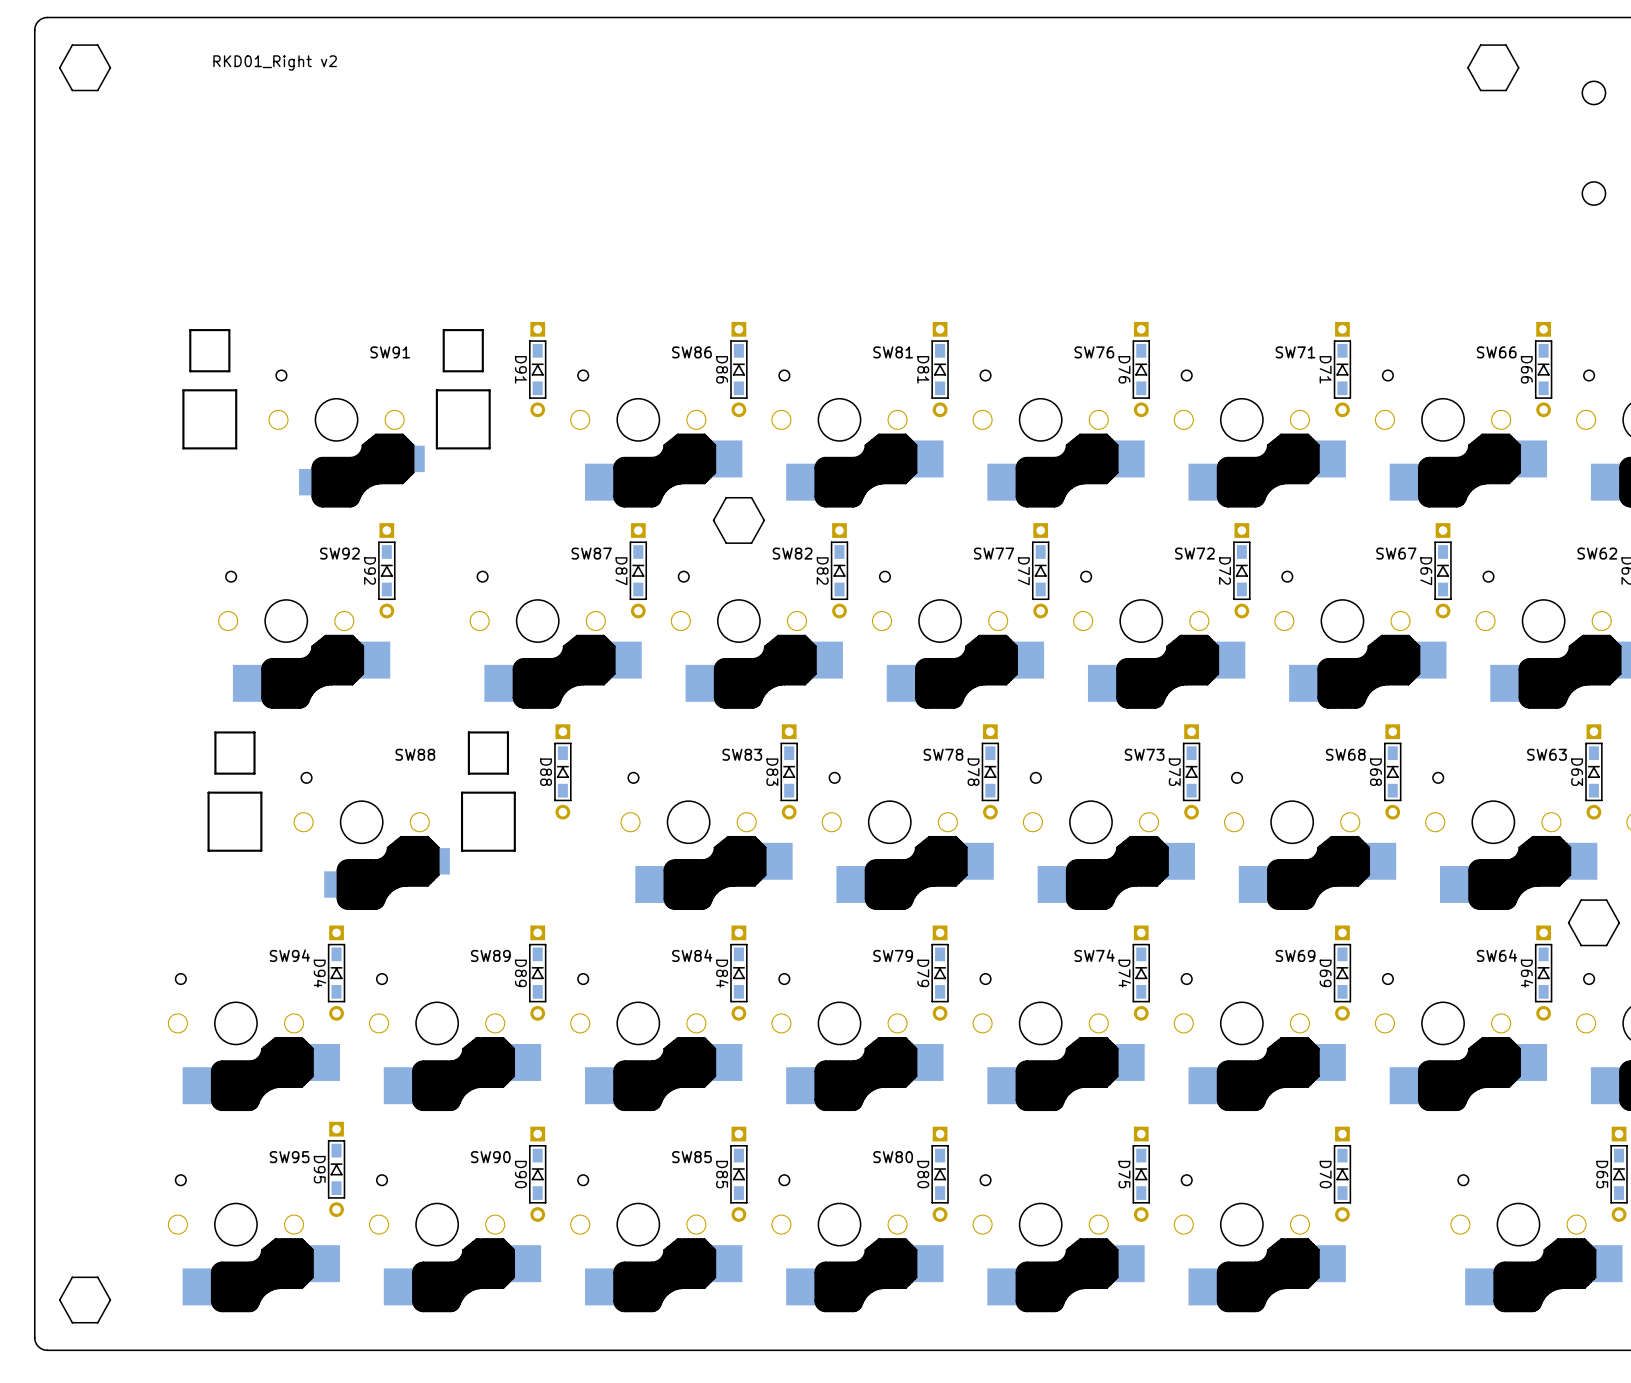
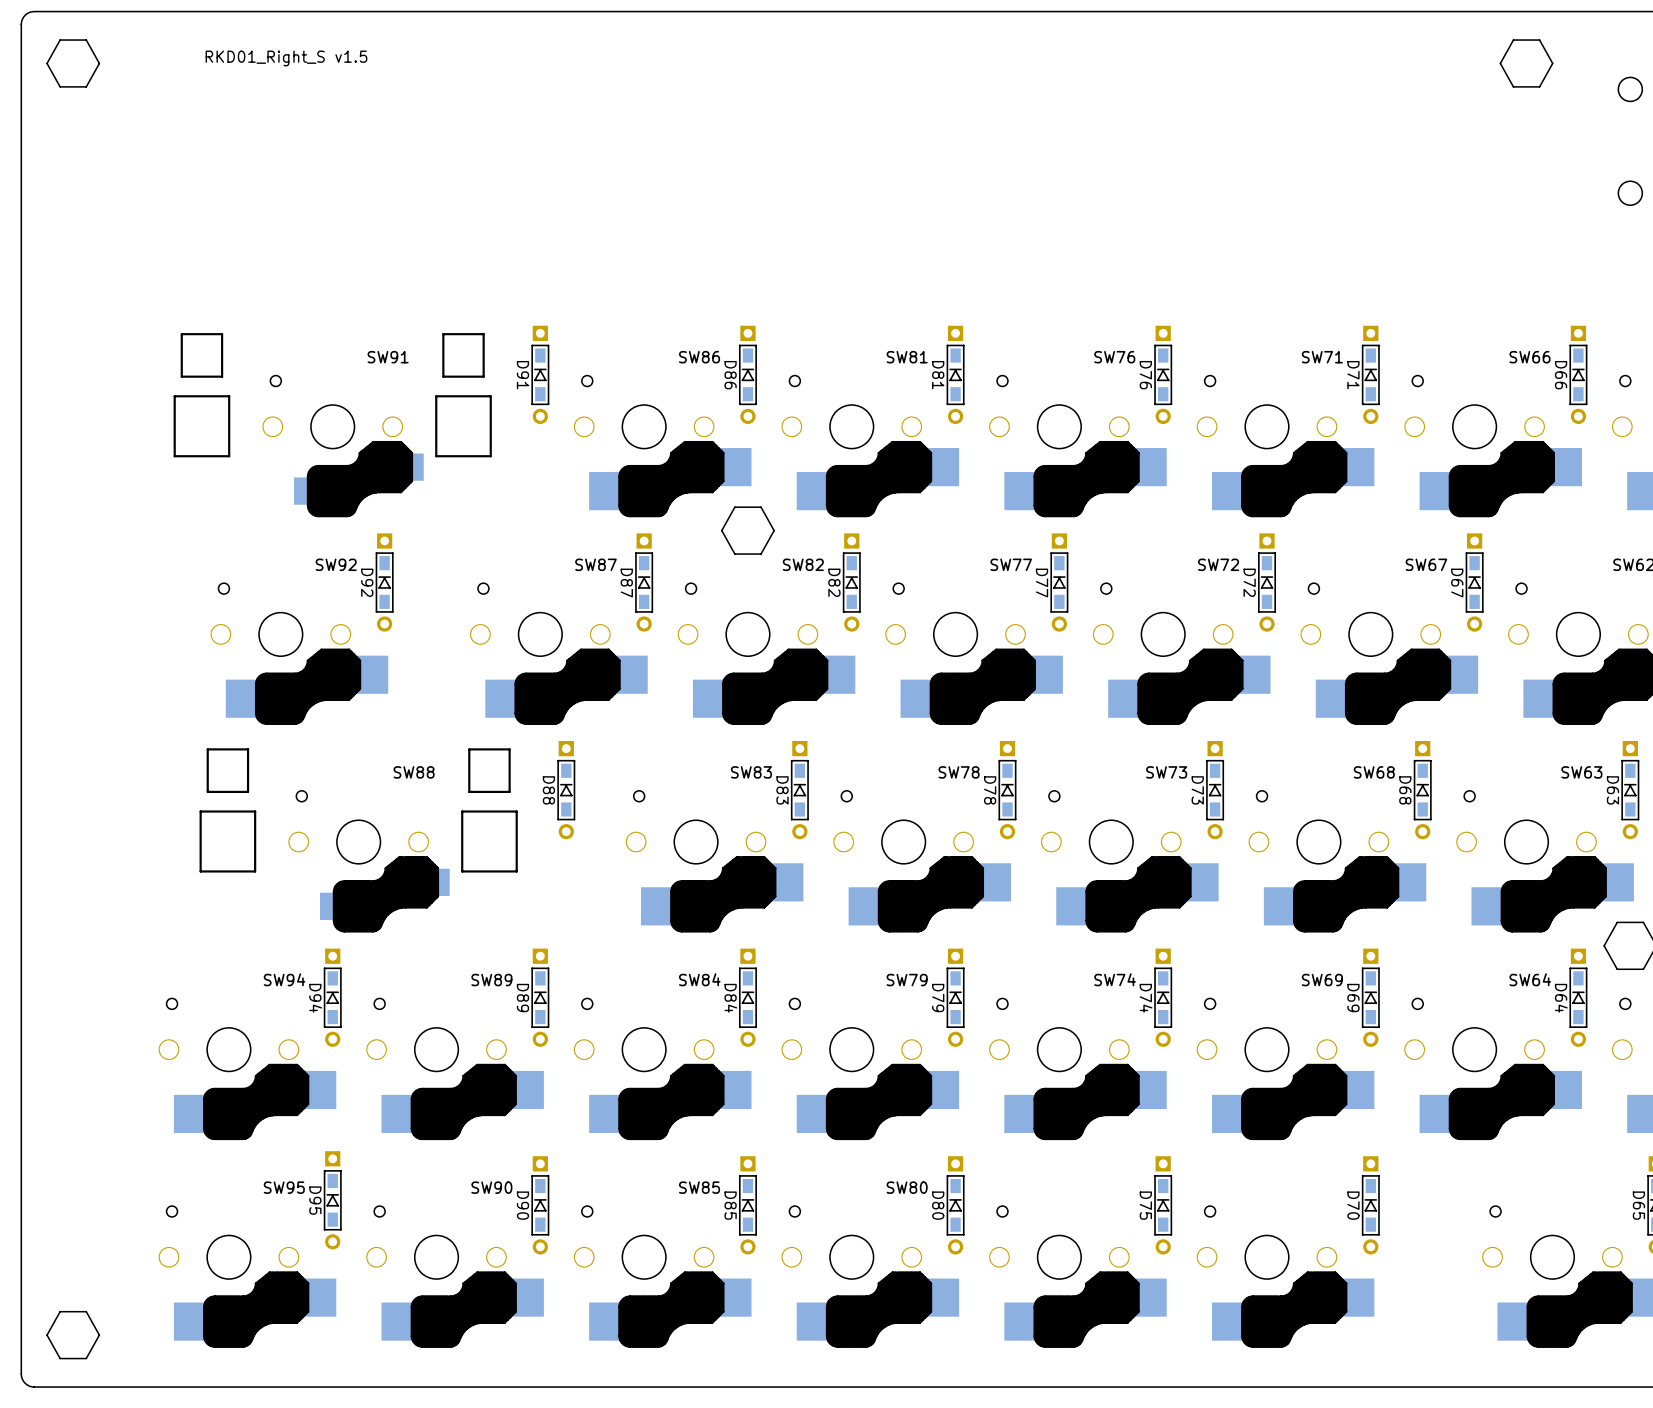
text: RKD01_Right v2 (275, 62) -> RKD01_Right_S v1.5 (286, 58)

